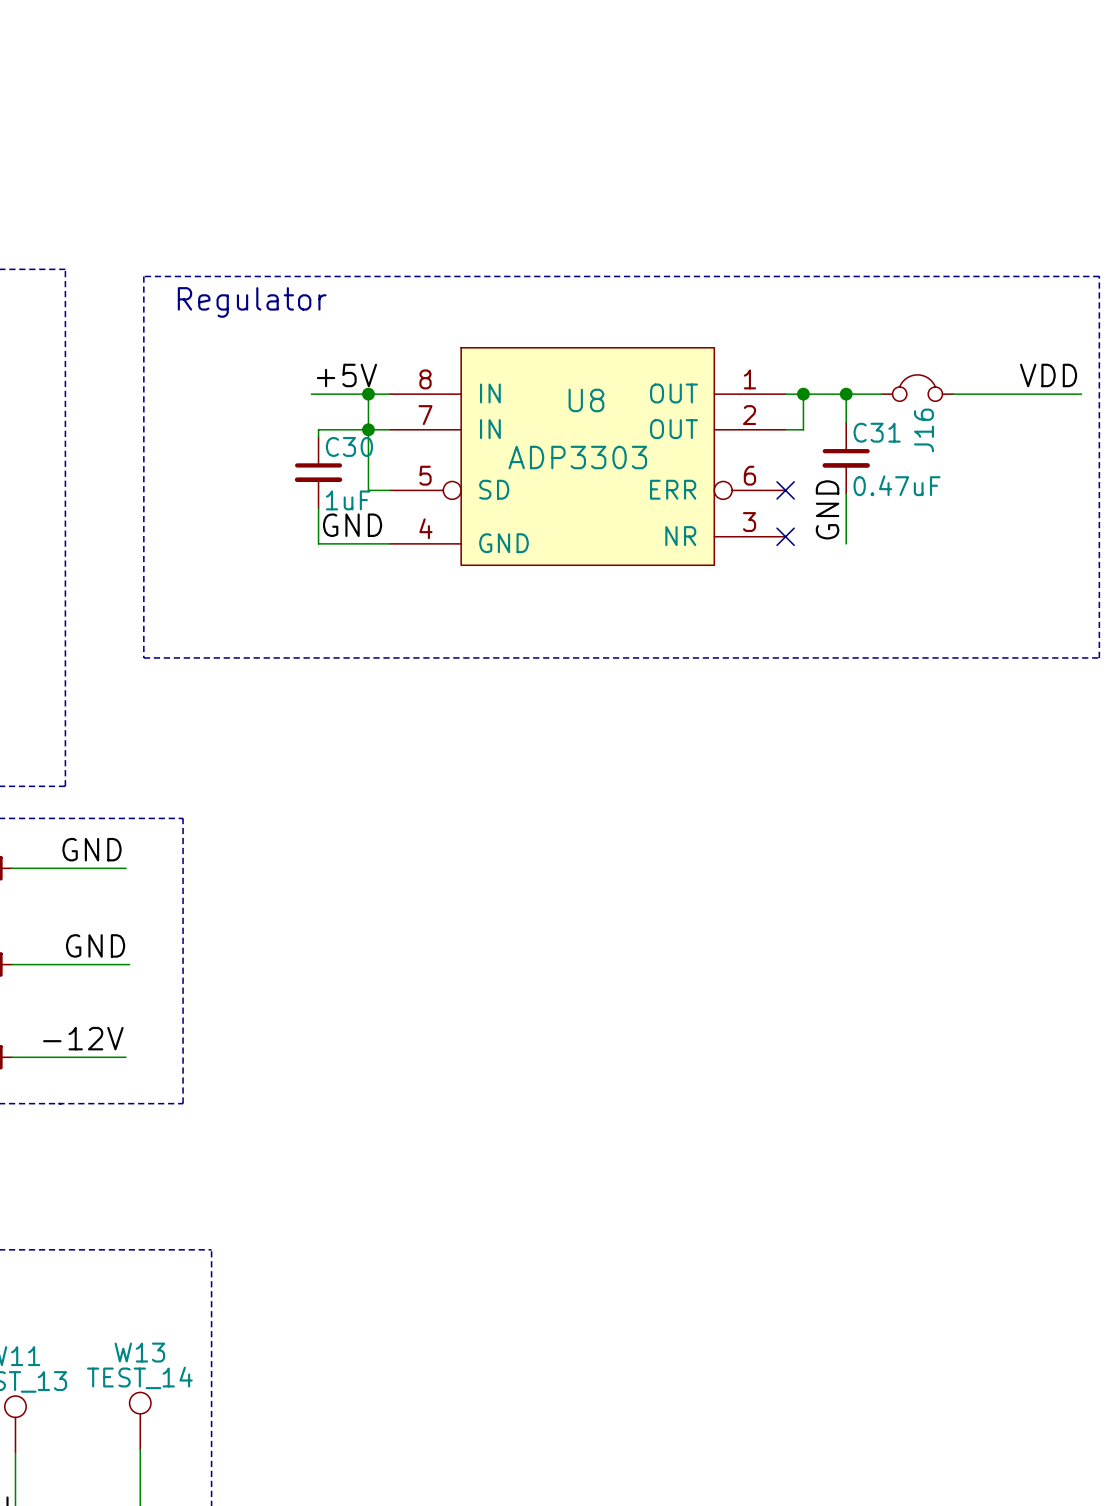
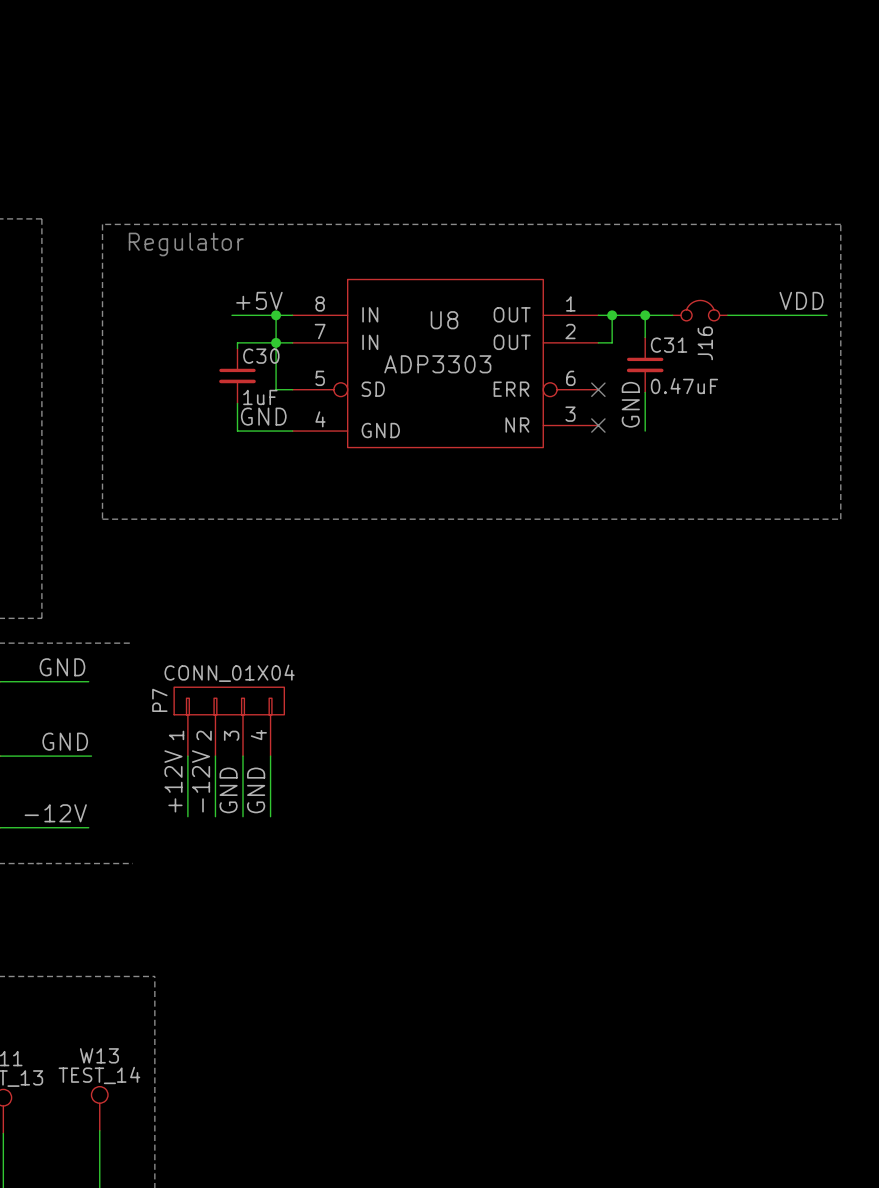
line: (183, 818) (183, 1103) -> none
P7: none -> CONN_01X04 (229, 721)
wire: none -> (187, 756) (187, 816)
wire: none -> (215, 756) (215, 816)
wire: none -> (243, 756) (243, 816)
wire: none -> (270, 756) (270, 816)
label: none -> +12V (173, 781)
label: none -> -12V (201, 781)
label: none -> GND (228, 790)
label: none -> GND (256, 790)

